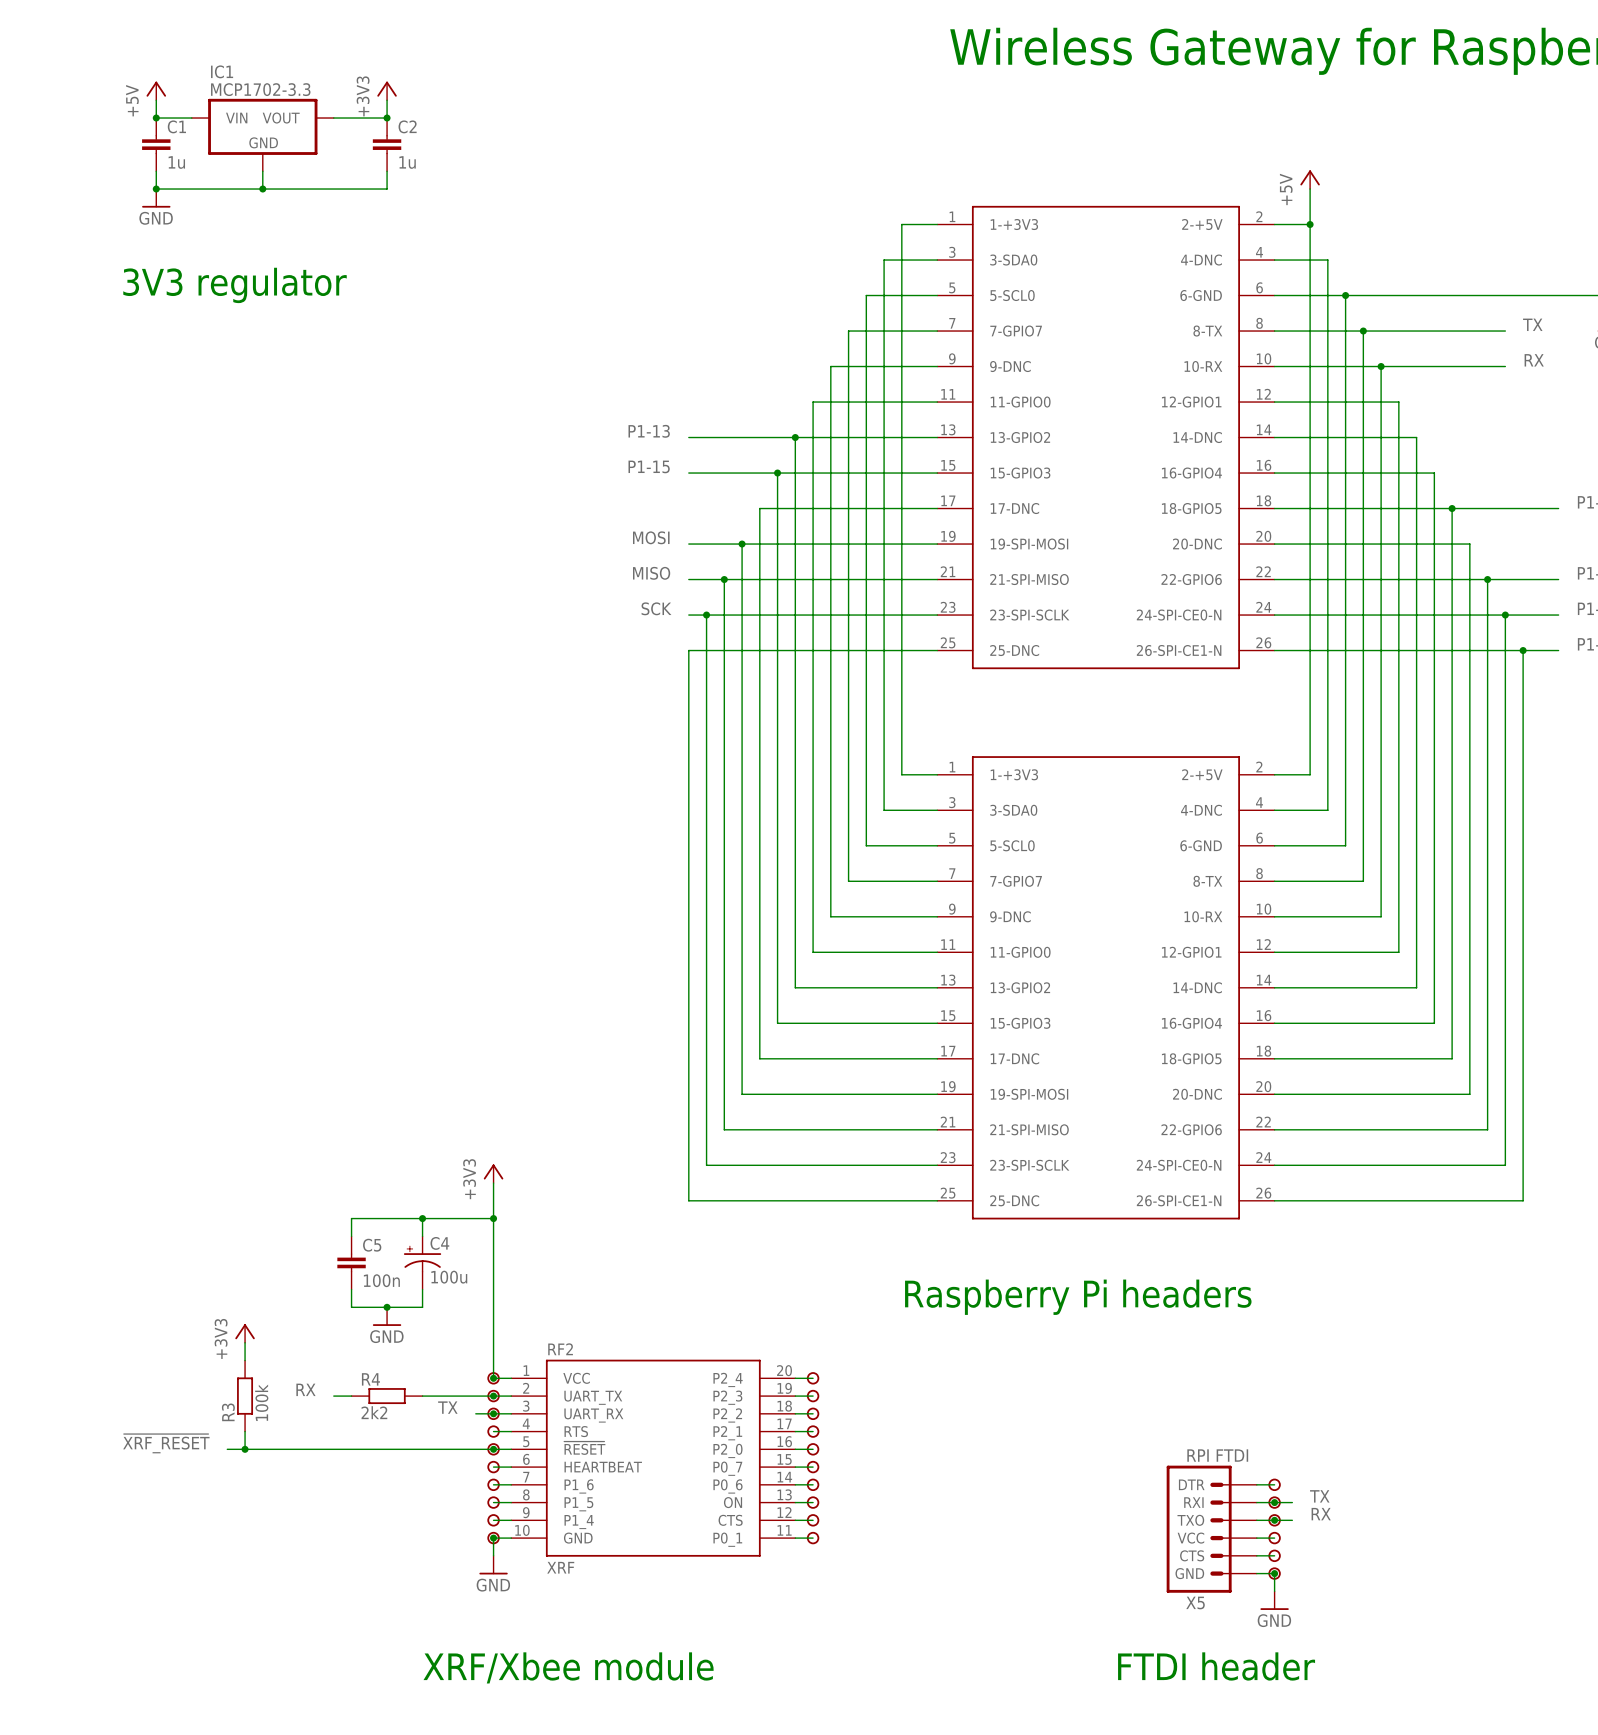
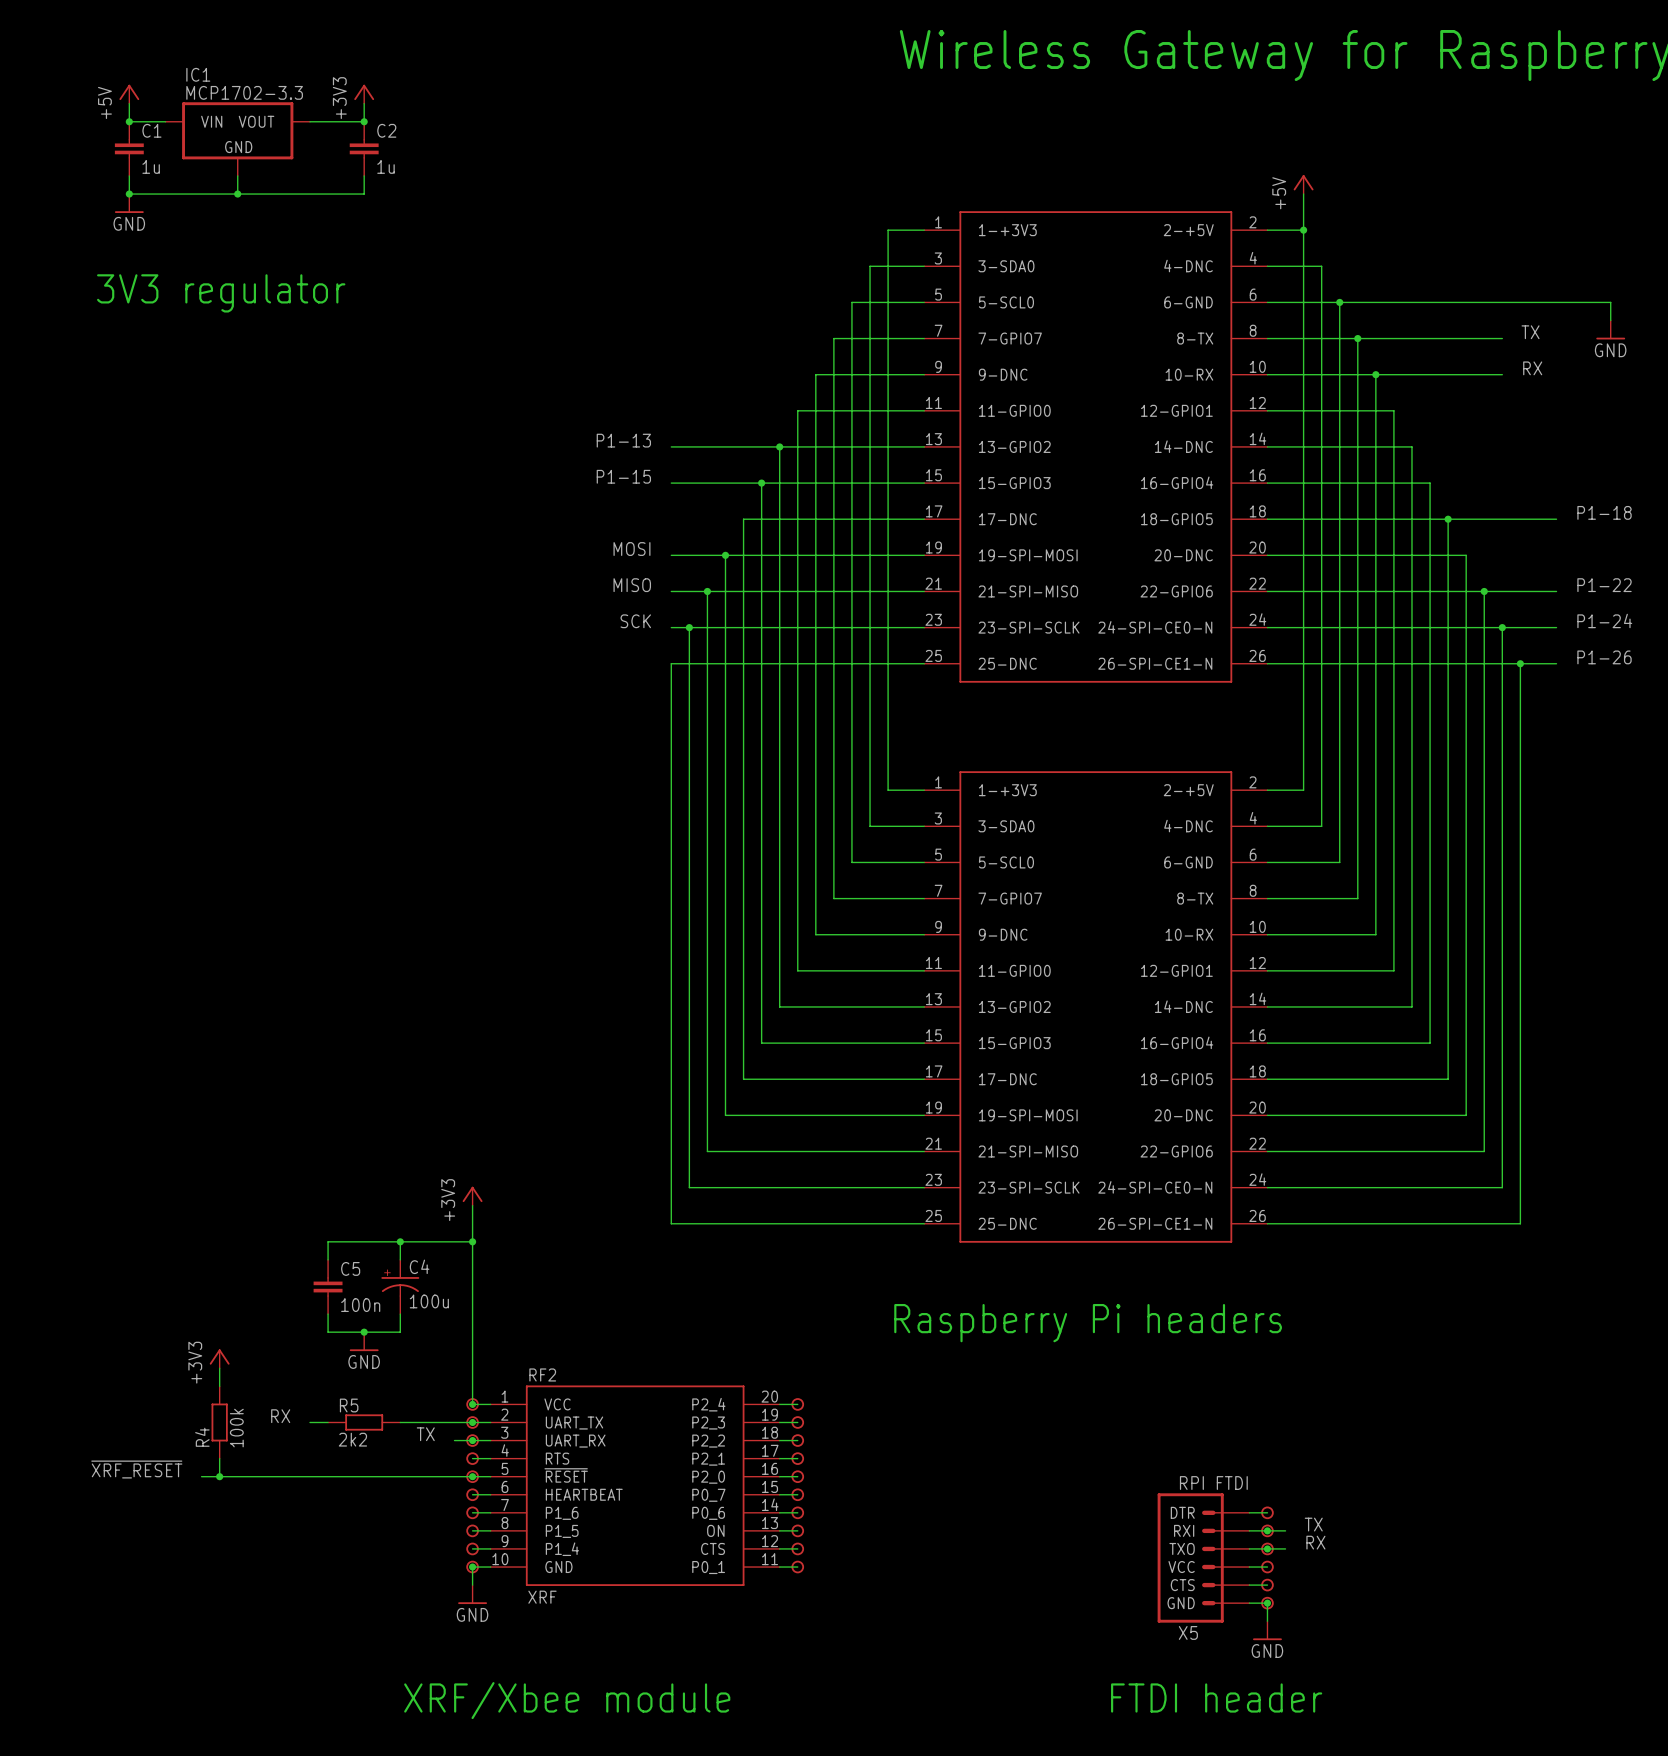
R4 name: R4 (370, 1379) -> R5 (349, 1405)
R3 name: R3 (228, 1412) -> R4 (202, 1437)

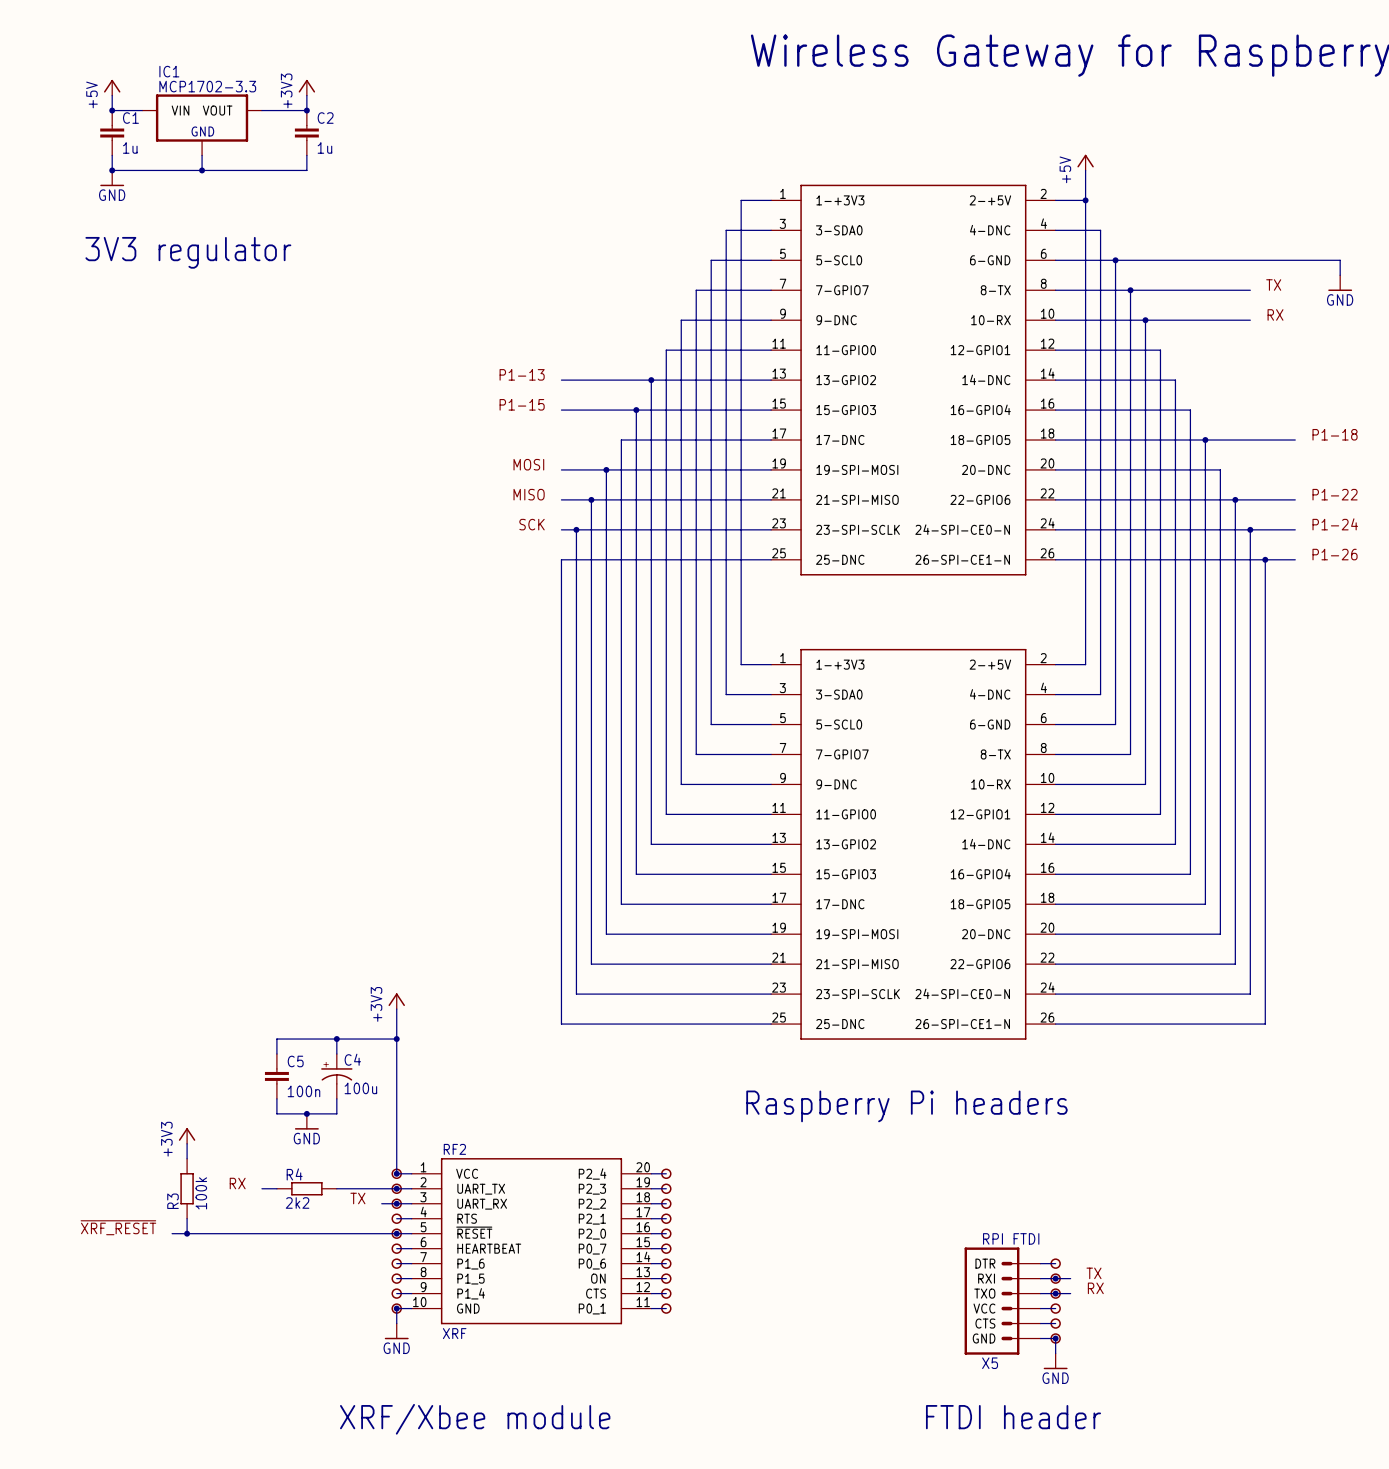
R5 name: R5 (349, 1405) -> R4 (294, 1174)
R4 name: R4 (202, 1437) -> R3 (173, 1201)

